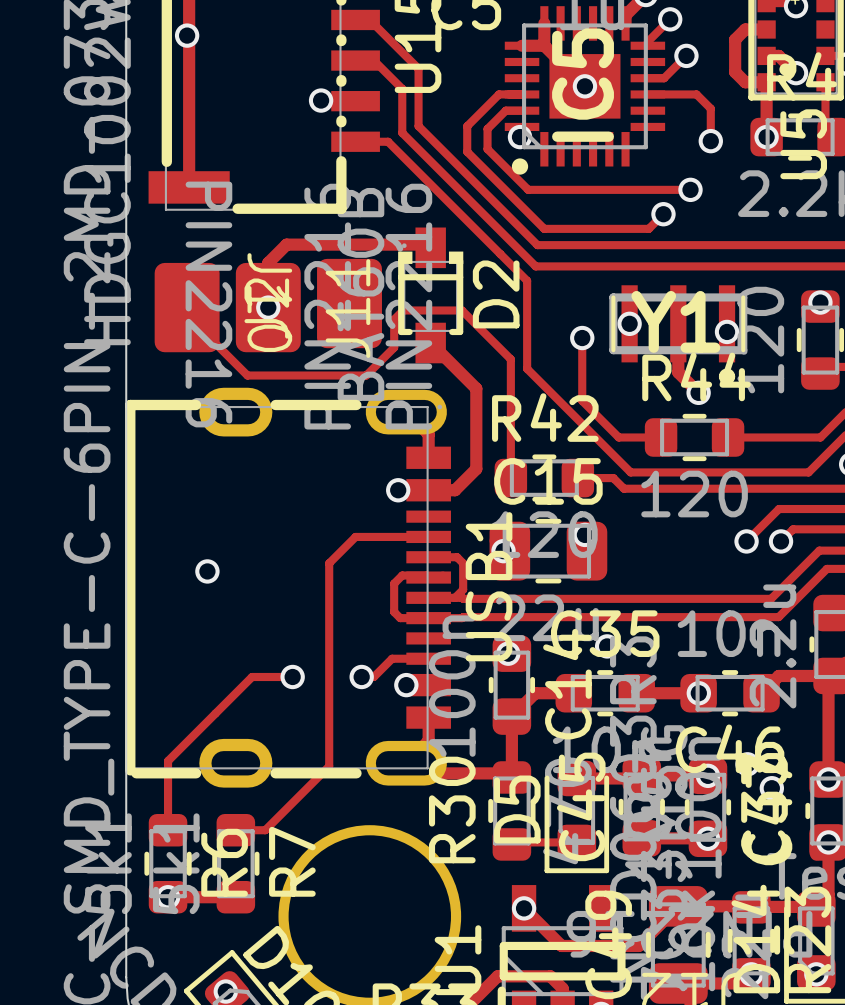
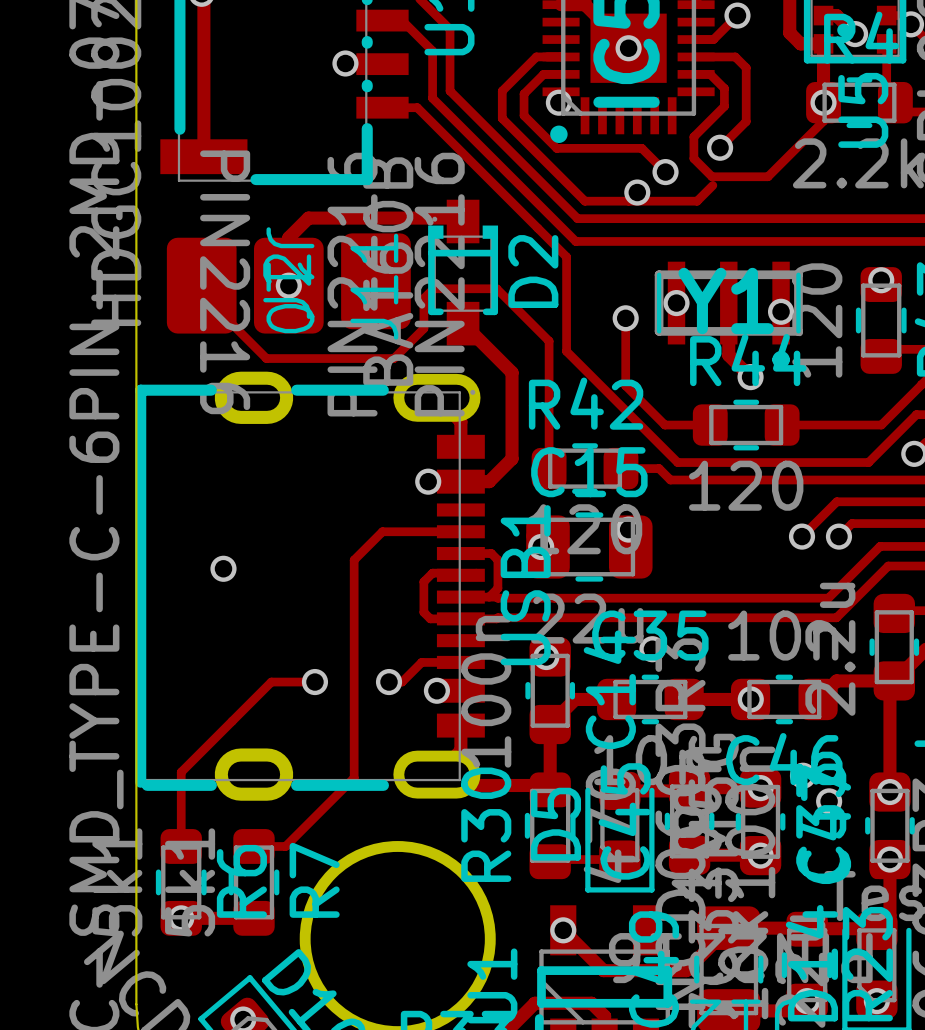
track: (684, 94) (696, 94) (710, 108) (710, 141) -> (735, 56) (746, 67) (746, 121) (720, 147)
track: none -> (696, 74) (710, 74) (724, 88) (724, 106) (693, 136) (693, 158) (712, 176) (767, 176) (823, 121) (823, 102)
via: (710, 141) -> none
track: (518, 179) (528, 189) (690, 189) -> (556, 148) (641, 148) (665, 172)
via position: (690, 189) -> (720, 147)
via: none -> (665, 172)
via: (663, 214) -> none
via: none -> (637, 192)

